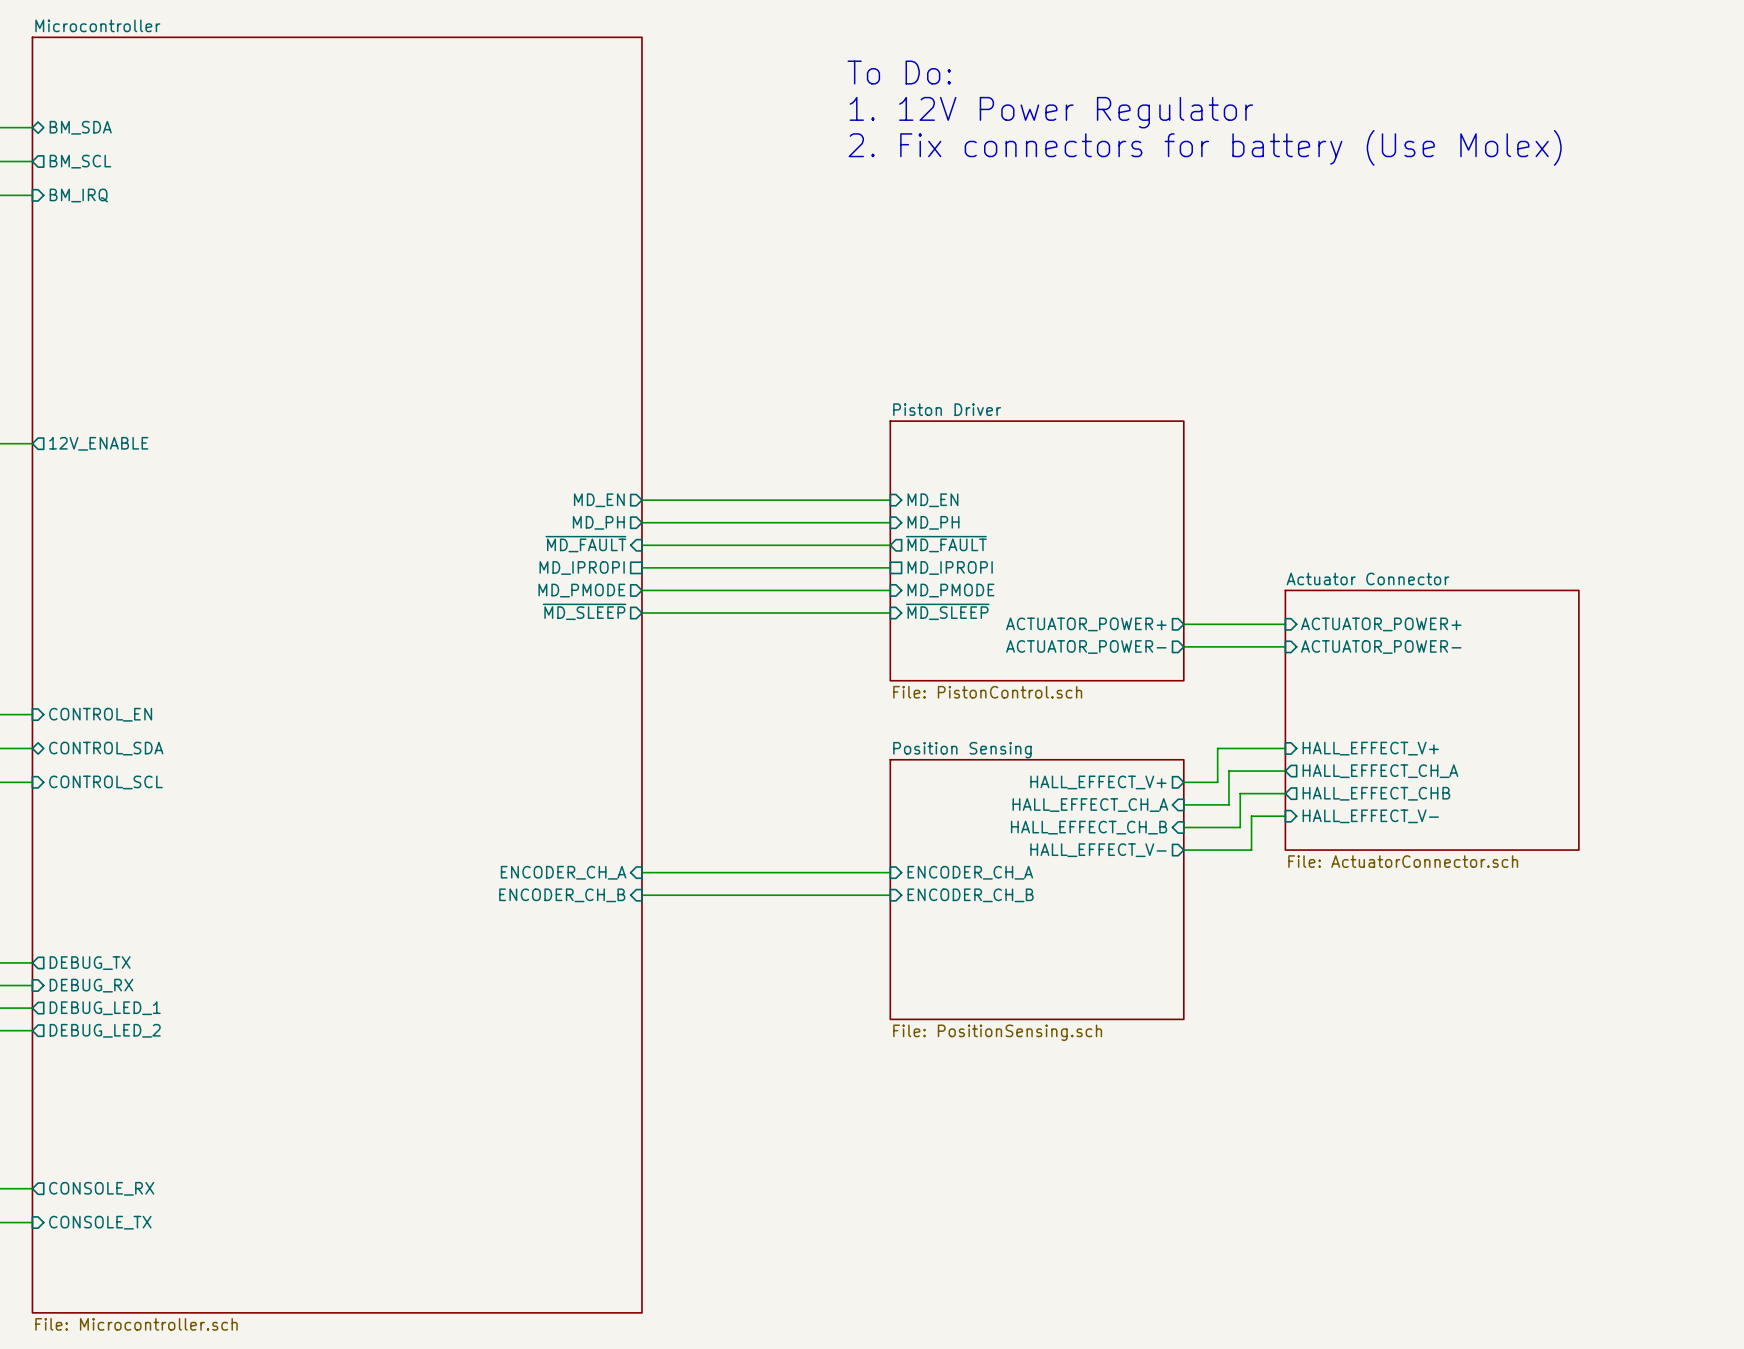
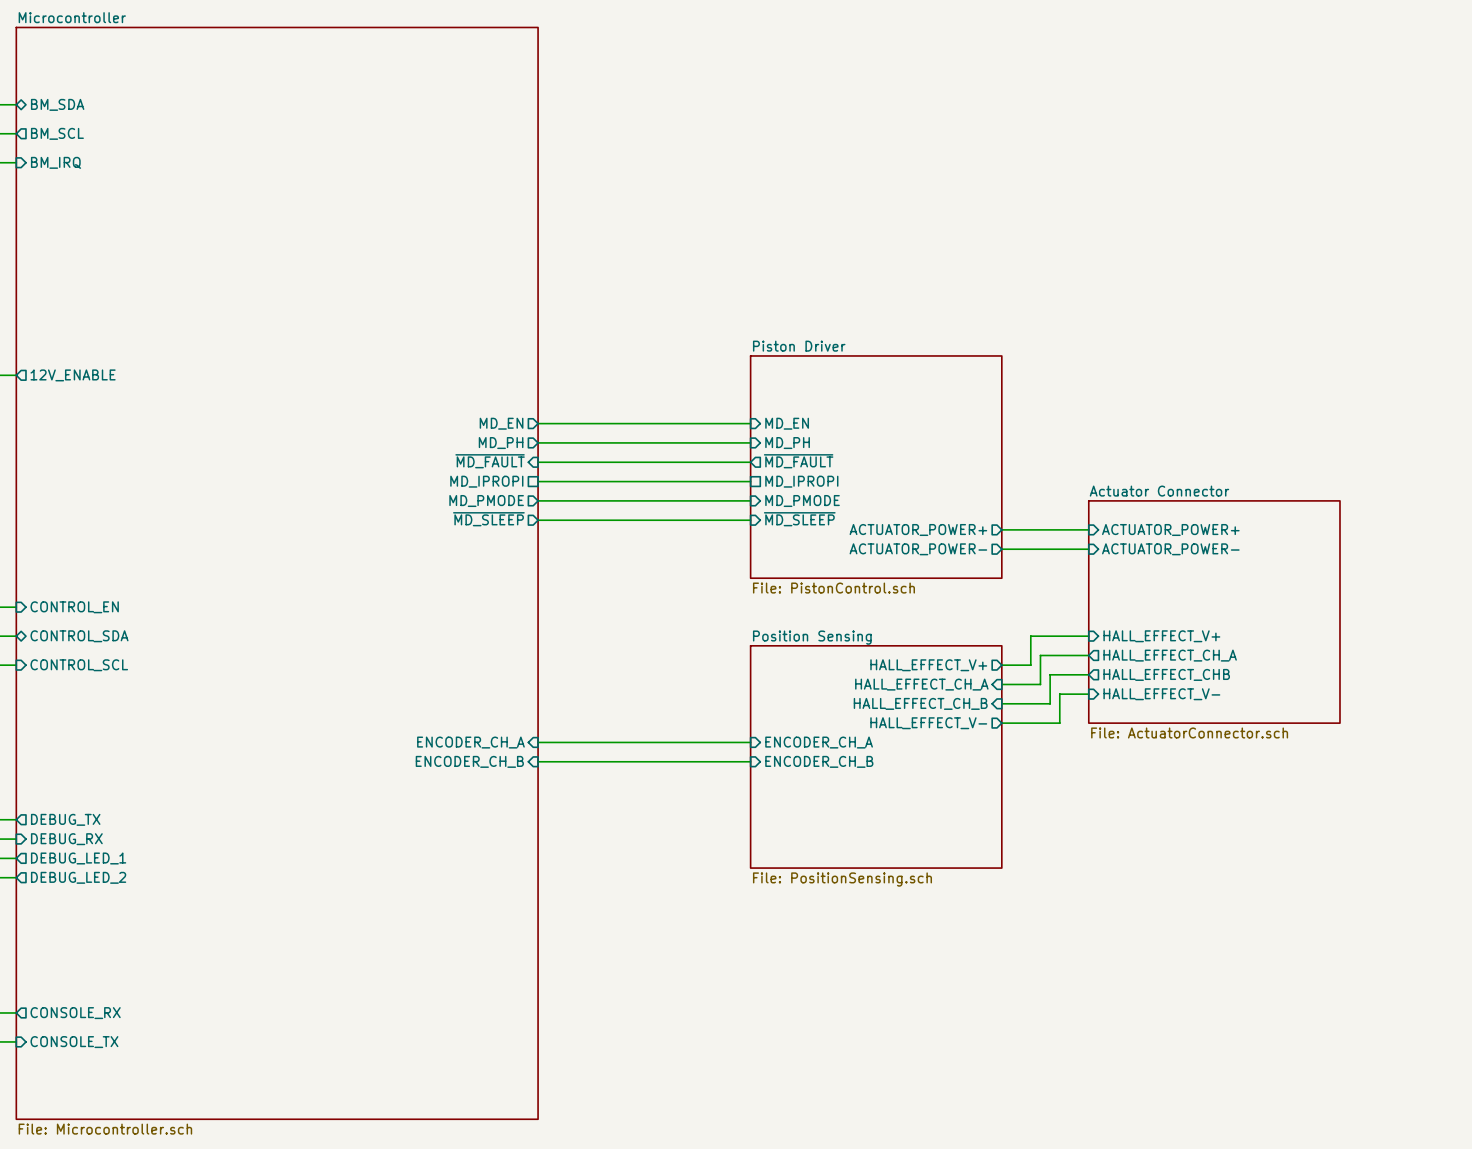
text: To Do: (899, 72) -> none
text: 1. 12V Power Regulator (1051, 112) -> none
text: 2. Fix connectors for battery (Use Molex) (1205, 147) -> none

